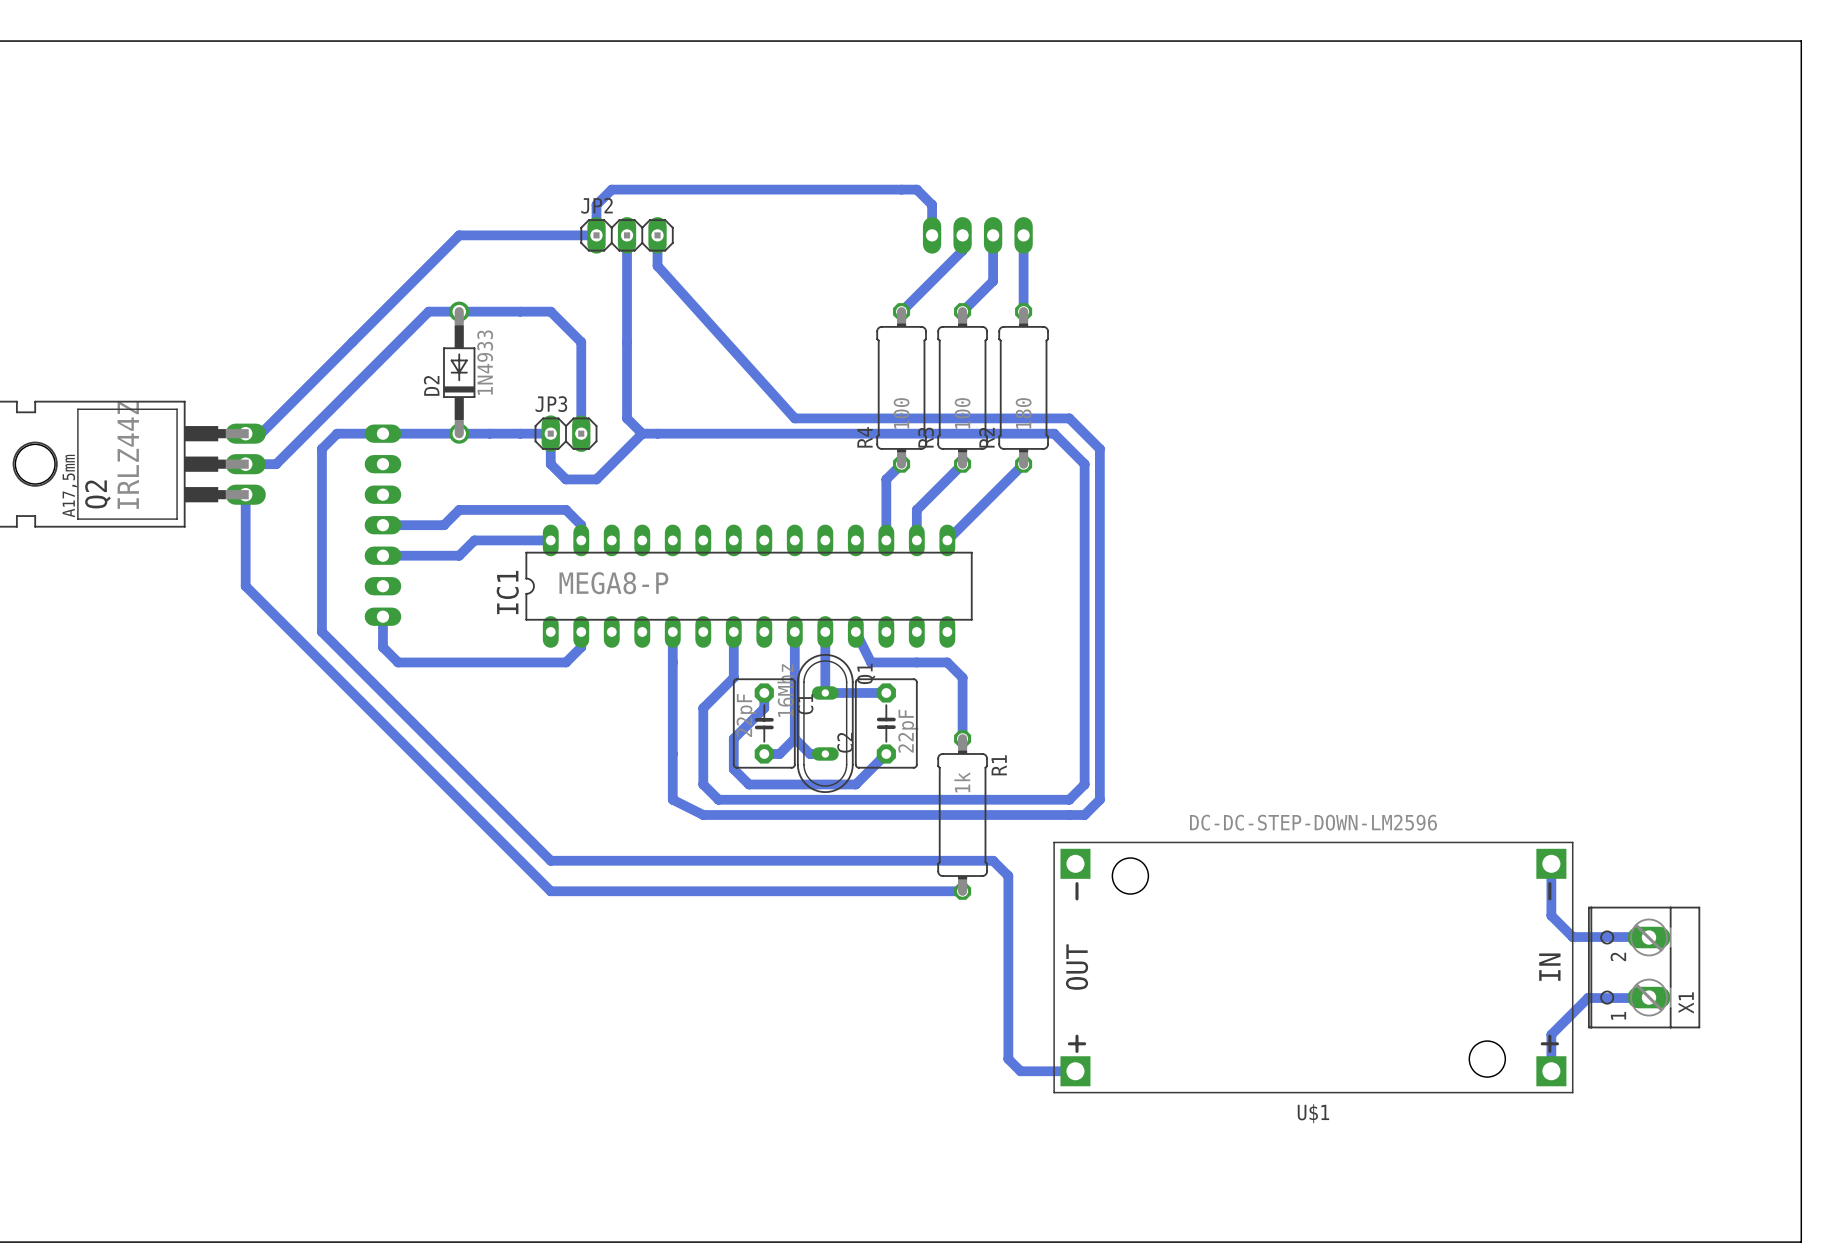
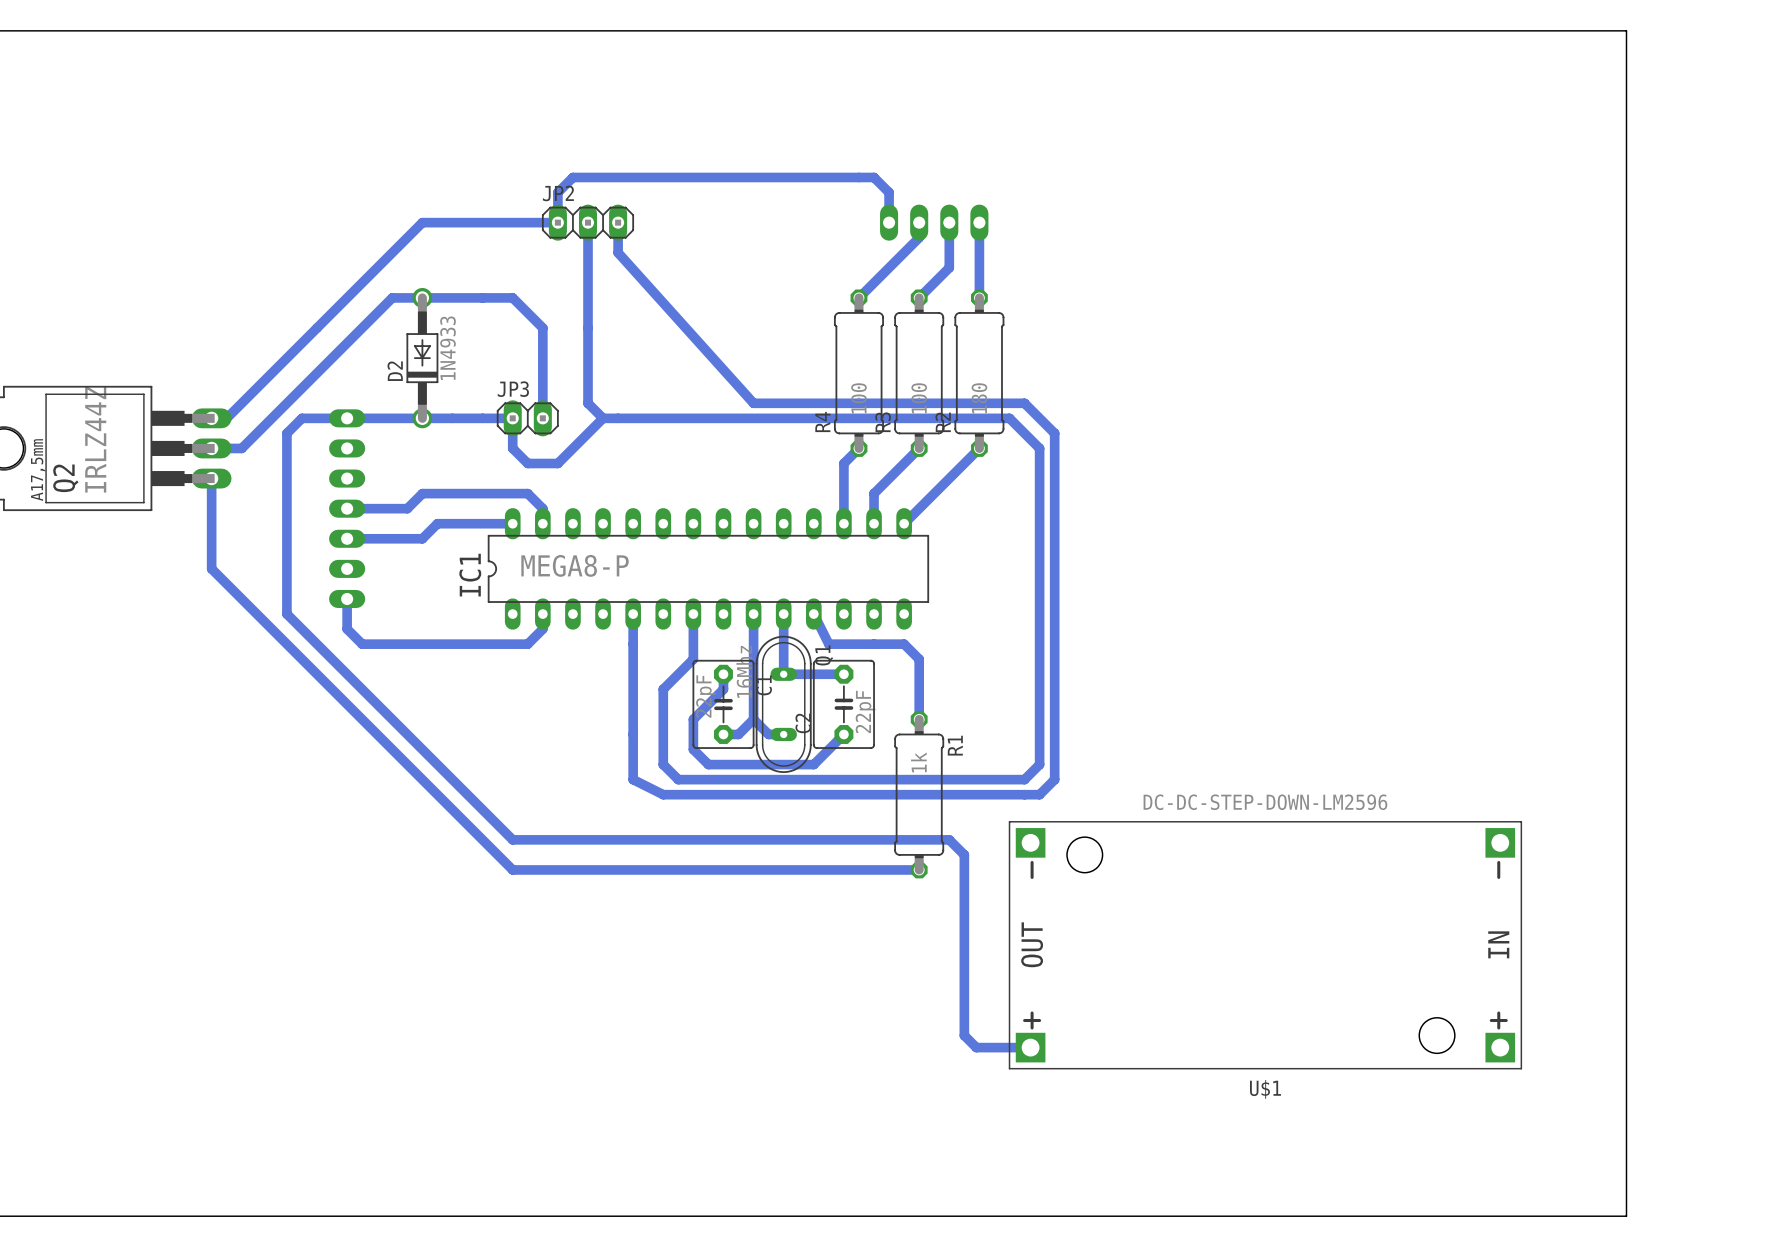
board edge: (1679, 41) (1801, 41) (1801, 1242) (1679, 1242) -> (1626, 30) (1626, 1216)
bottom track: (1551, 863) (1551, 915) (1572, 937) (1649, 937) -> none
X1: (1644, 967) -> none
bottom track: (1649, 997) (1587, 998) (1551, 1034) (1551, 1071) -> none

